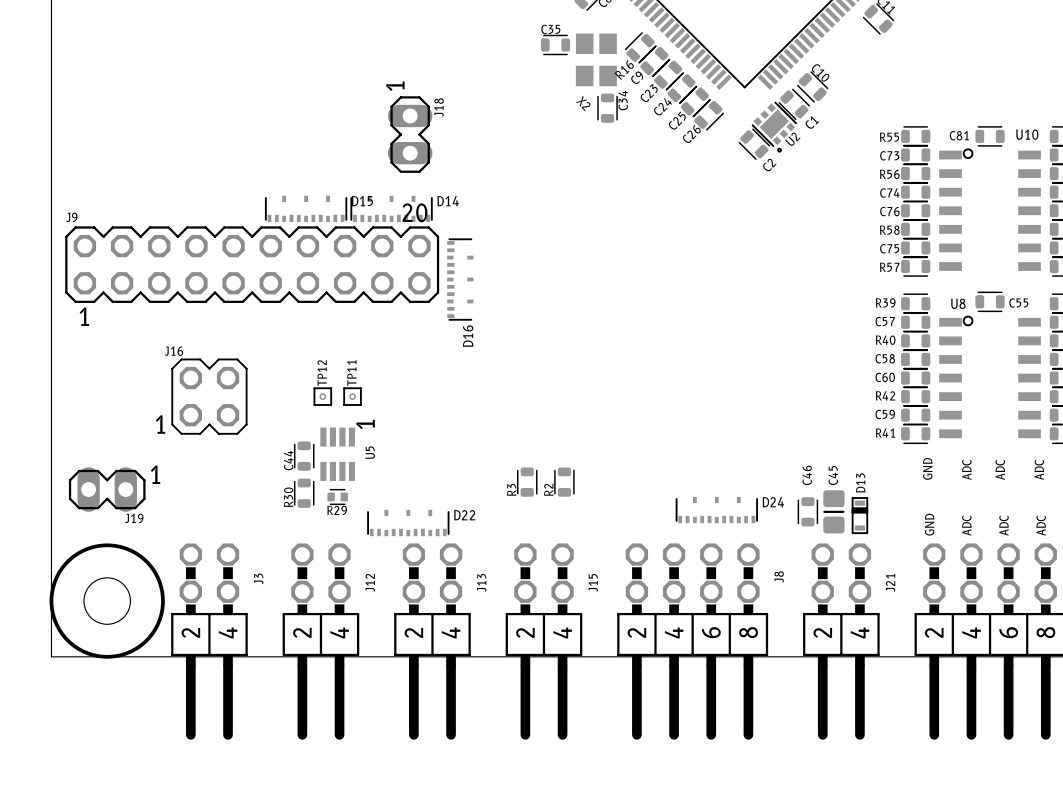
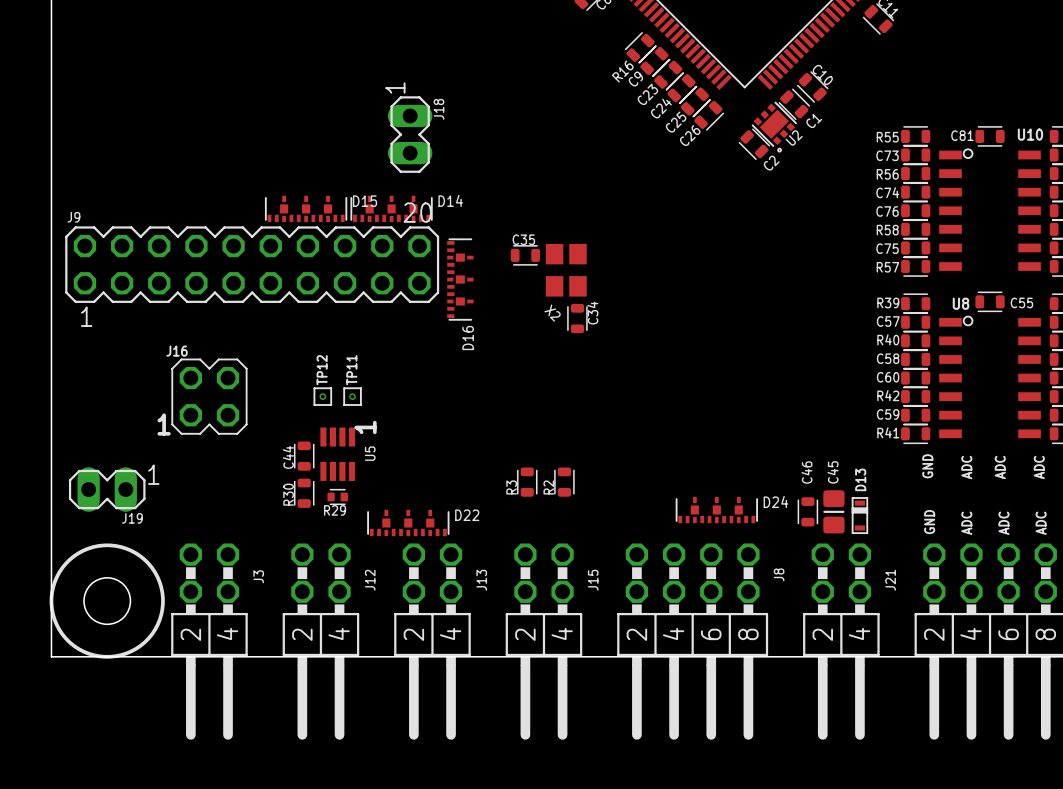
C35 position: (555, 44) -> (525, 255)
X2 position: (596, 59) -> (566, 270)
C34 position: (607, 108) -> (577, 318)
D15 footprint: [264, 195, 348, 223] -> [264, 195, 348, 223]
D14 footprint: [350, 195, 433, 223] -> [350, 195, 433, 223]
D16 footprint: [447, 238, 474, 321] -> [447, 238, 474, 321]
D24 footprint: [675, 496, 759, 524] -> [675, 496, 759, 524]
D22 footprint: [367, 509, 450, 537] -> [367, 509, 450, 537]

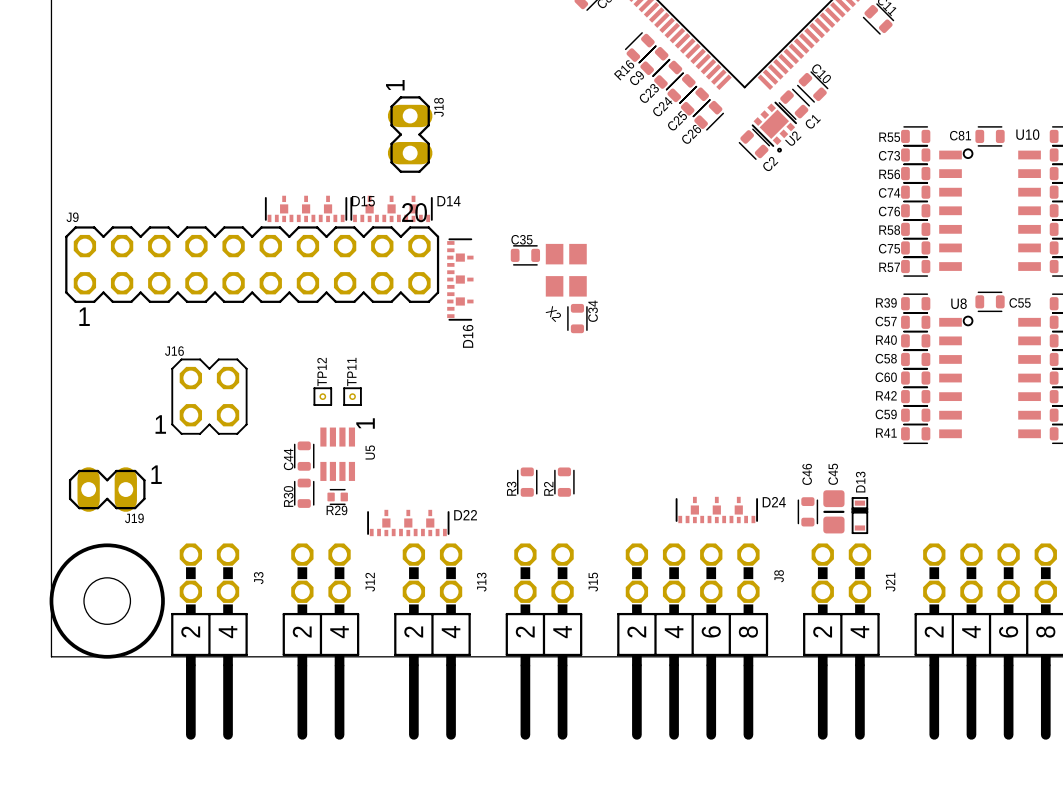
text: GND (927, 466) -> none
text: ADC (966, 467) -> none
text: ADC (1000, 467) -> none
text: ADC (1039, 467) -> none
text: GND (929, 522) -> none
text: ADC (966, 523) -> none
text: ADC (1003, 523) -> none
text: ADC (1041, 523) -> none

